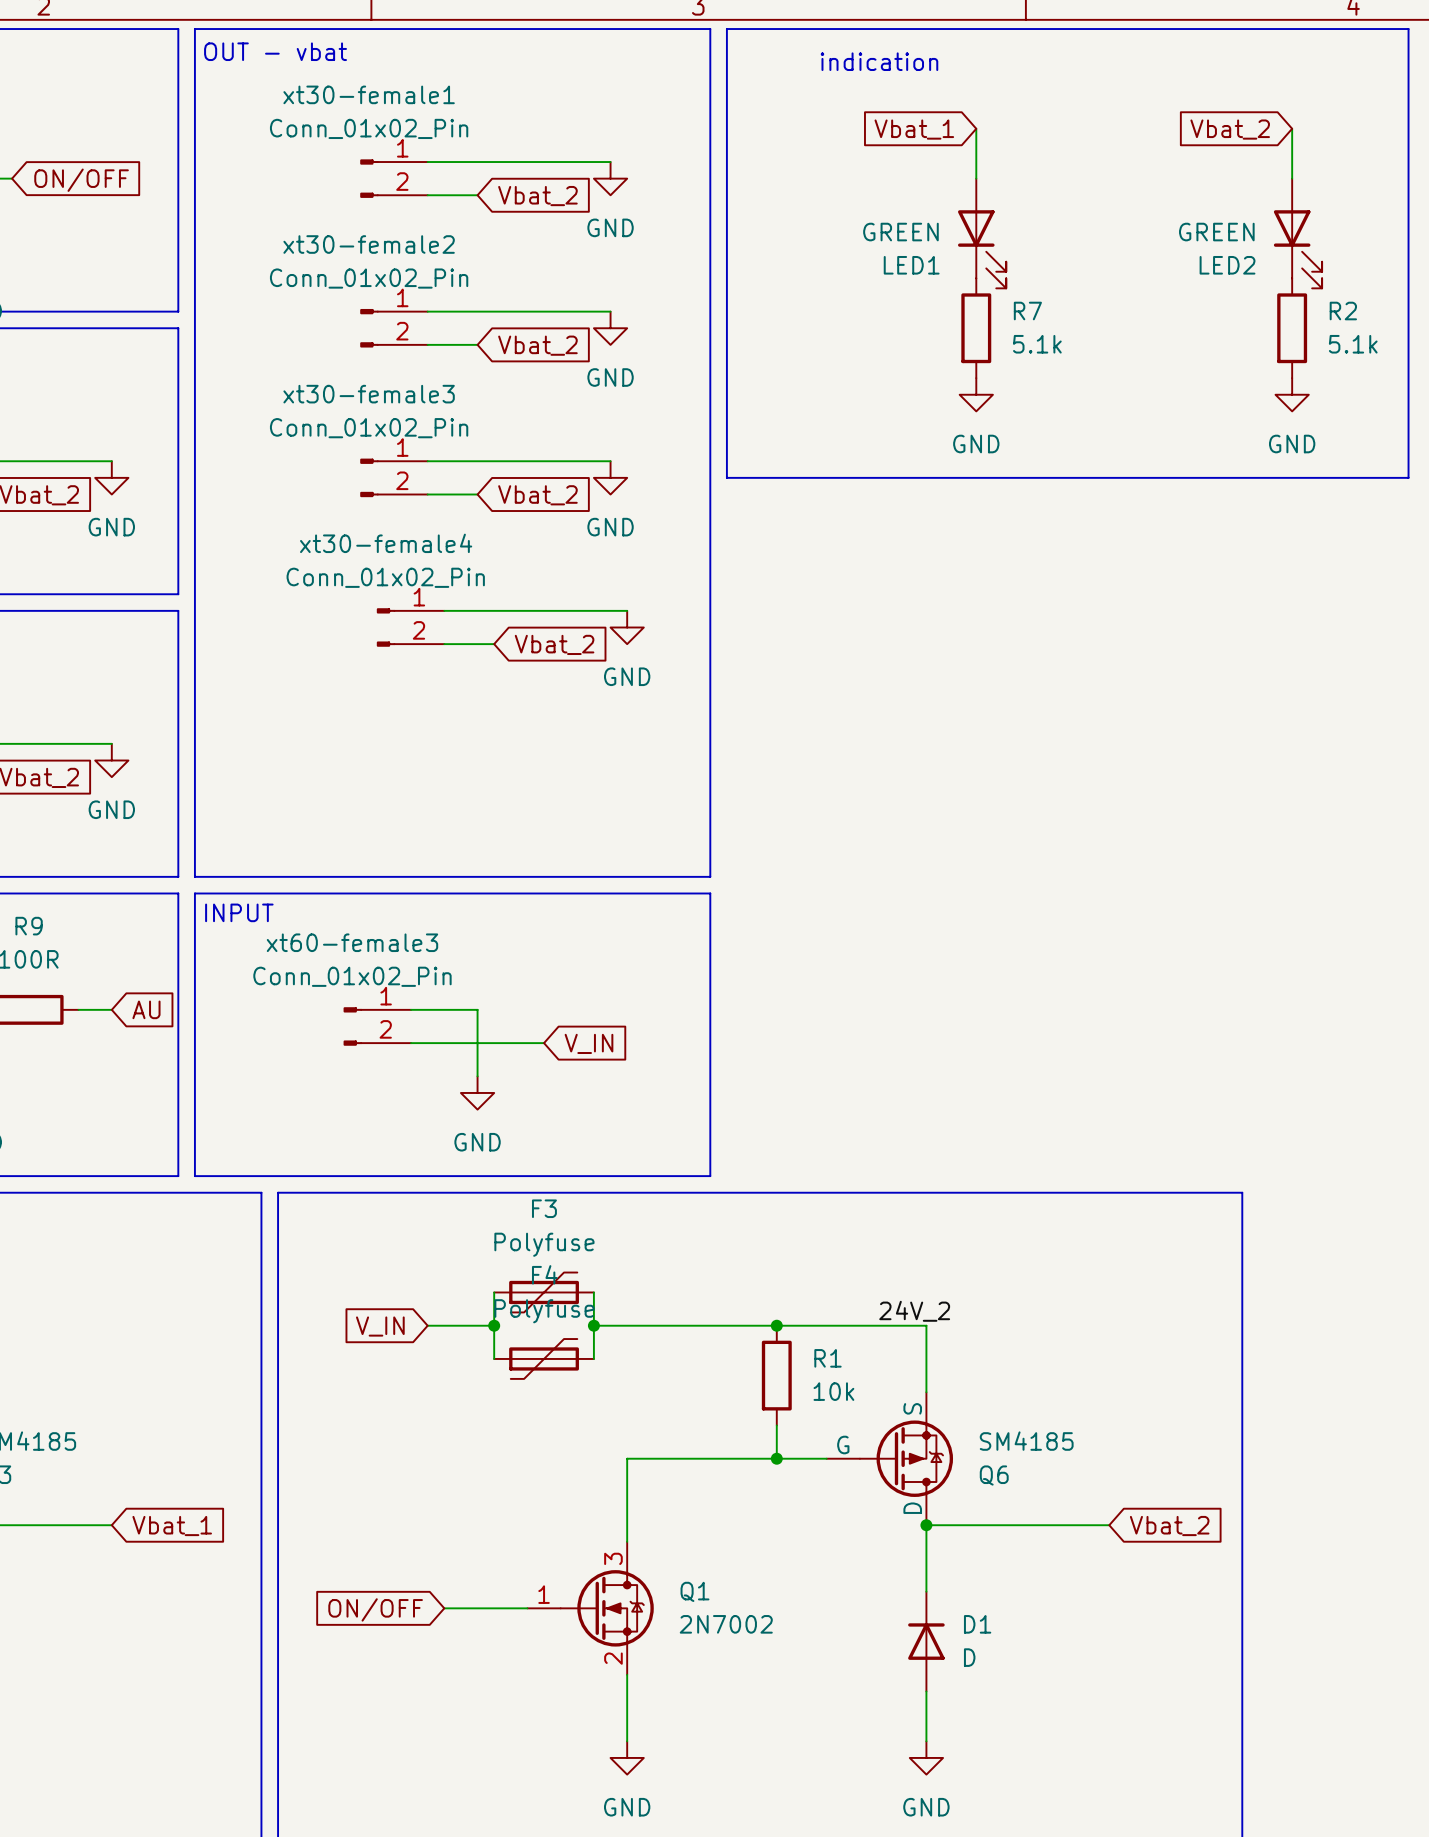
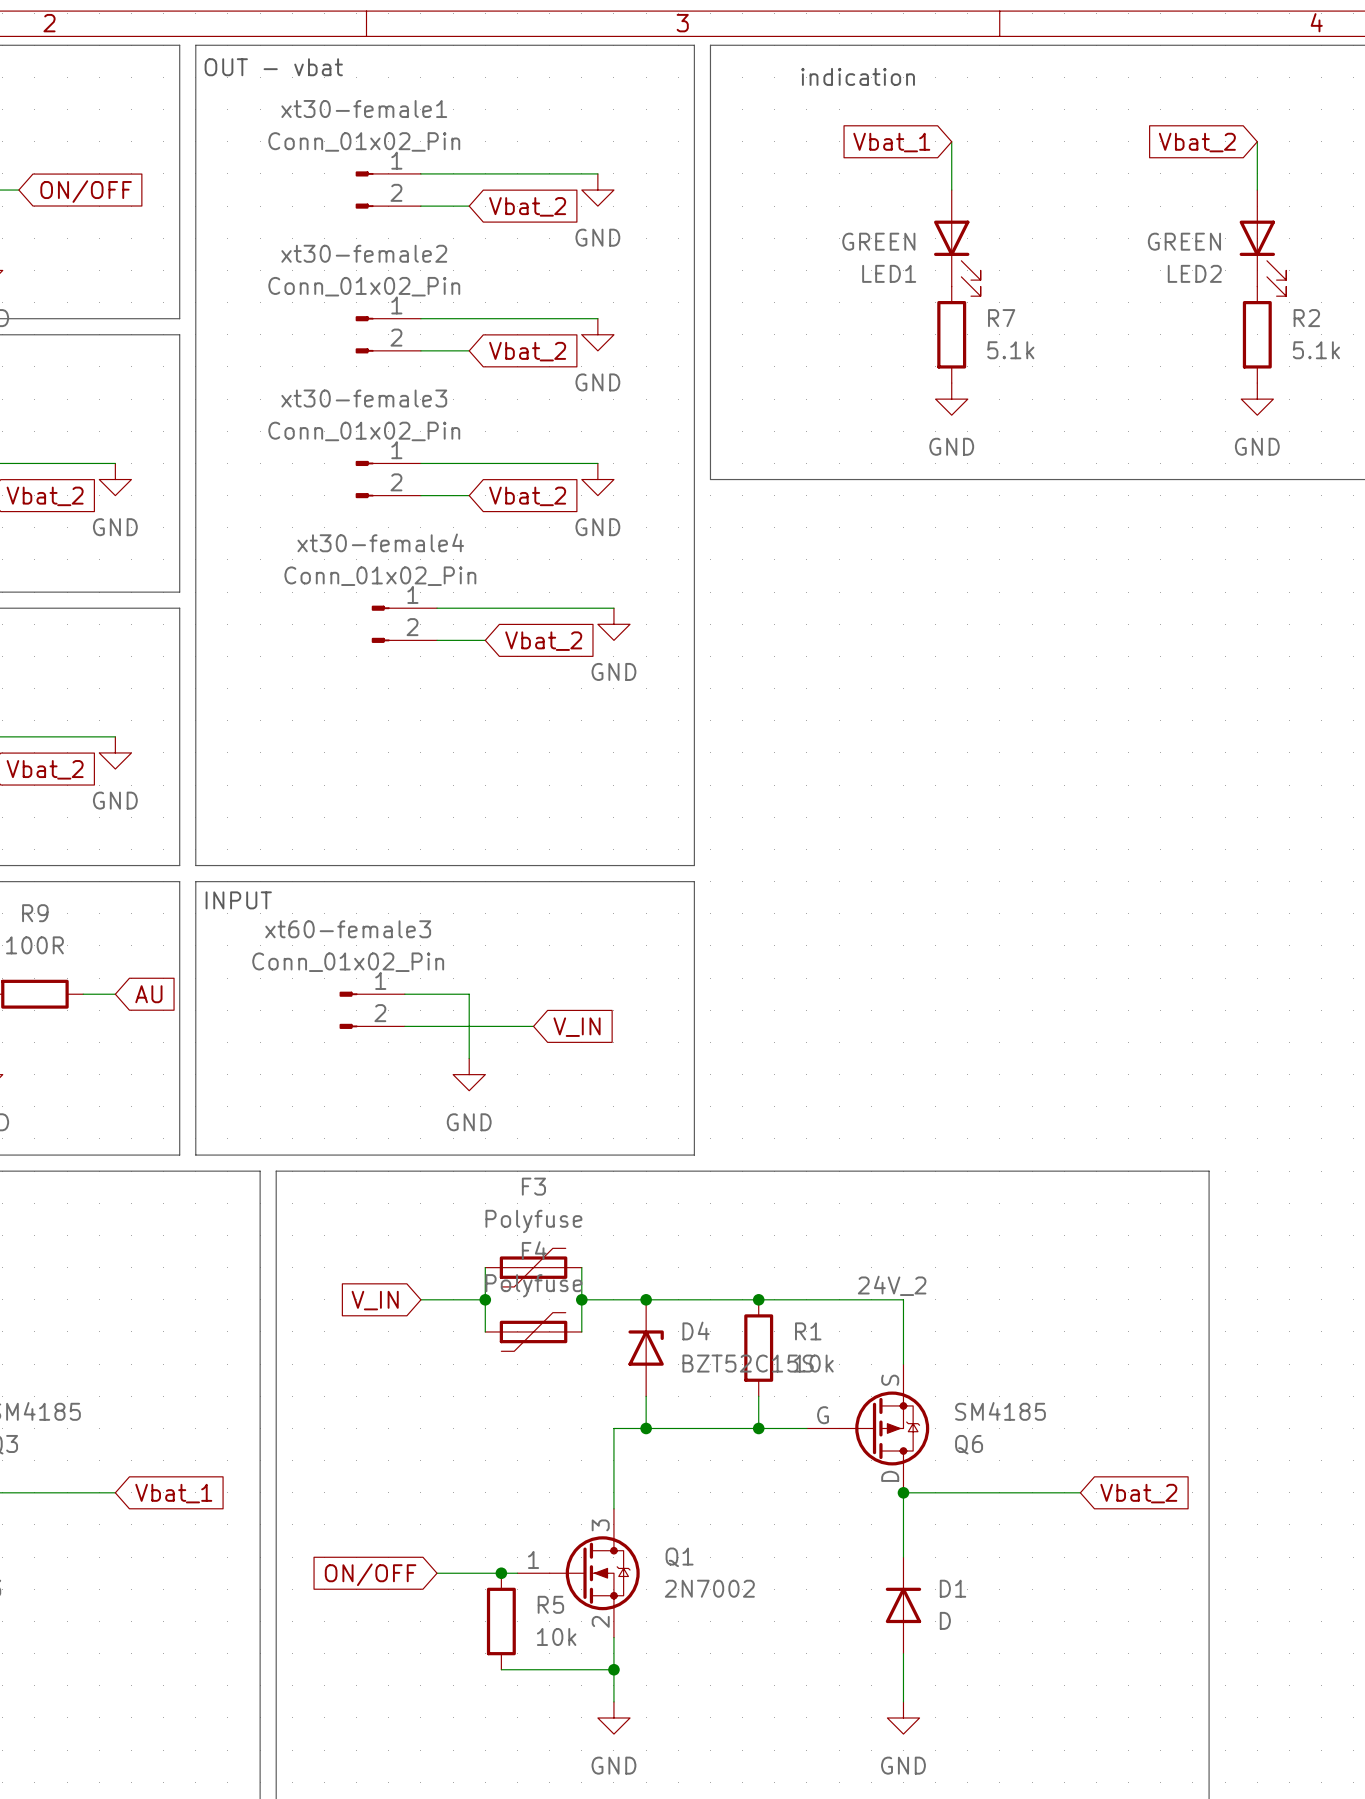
junction: none -> (646, 1299)
D4: none -> BZT52C15S (646, 1348)
wire: none -> (646, 1396) (646, 1428)
junction: none -> (646, 1428)
junction: none -> (501, 1573)
R5: none -> 10k (501, 1621)
wire: none -> (501, 1669) (613, 1669)
junction: none -> (613, 1669)

